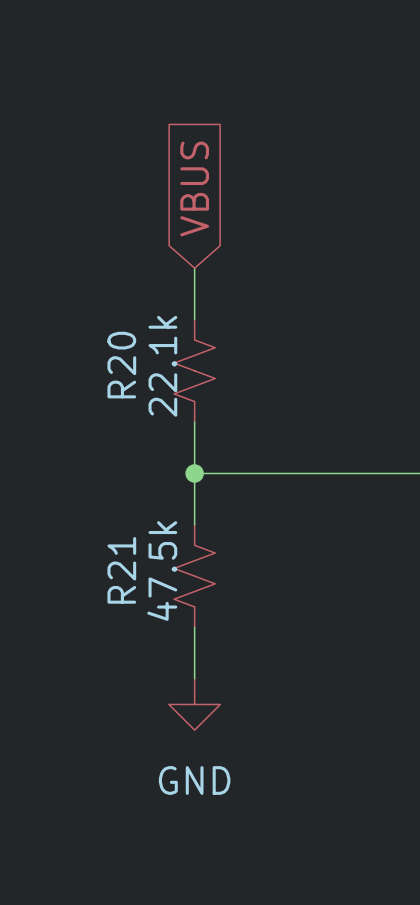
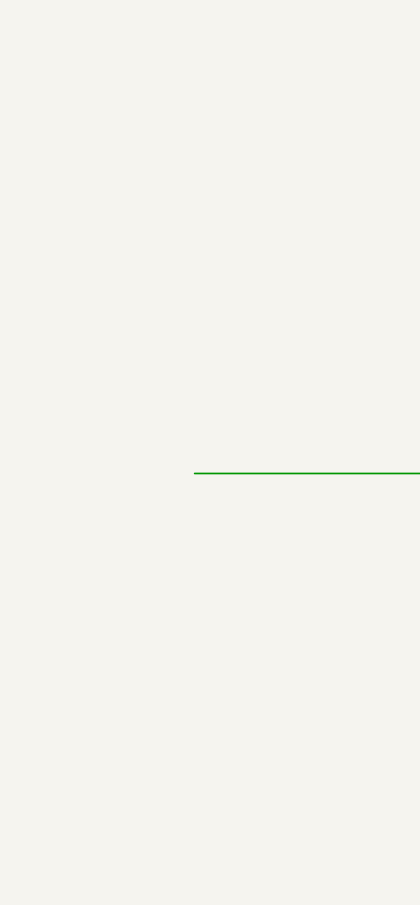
global label: VBUS (194, 188) -> none
wire: (194, 268) (194, 319) -> none
R20: 22.1k (194, 370) -> none
wire: (194, 422) (194, 524) -> none
junction: (194, 473) -> none
R21: 47.5k (194, 576) -> none
wire: (194, 627) (194, 678) -> none
power symbol: GND (194, 704) -> none

